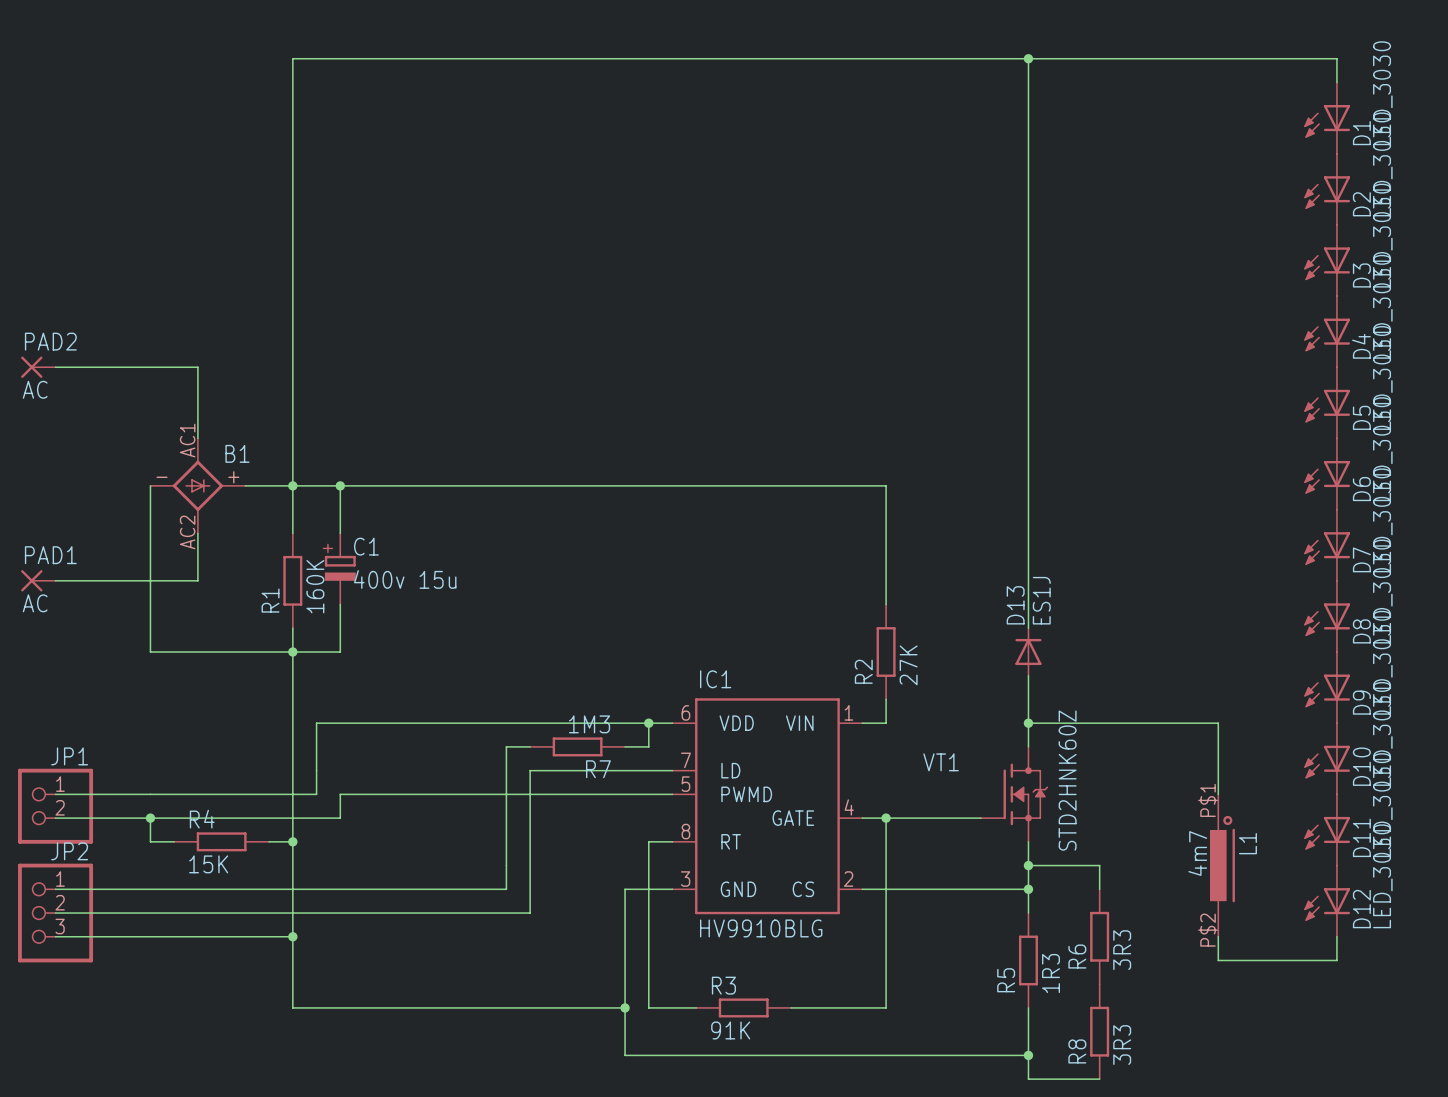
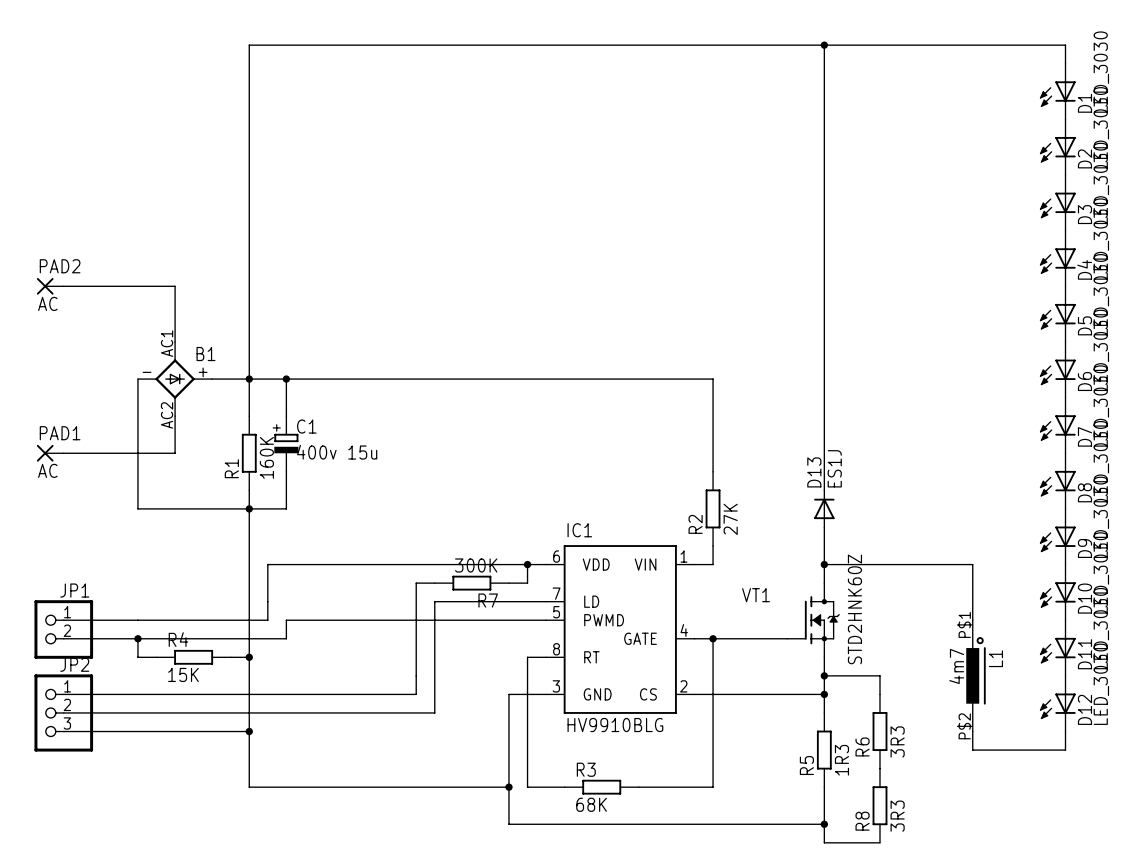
R7 value: 1M3 (589, 724) -> 300K (476, 565)
R3 value: 91K (730, 1030) -> 68K (591, 804)

